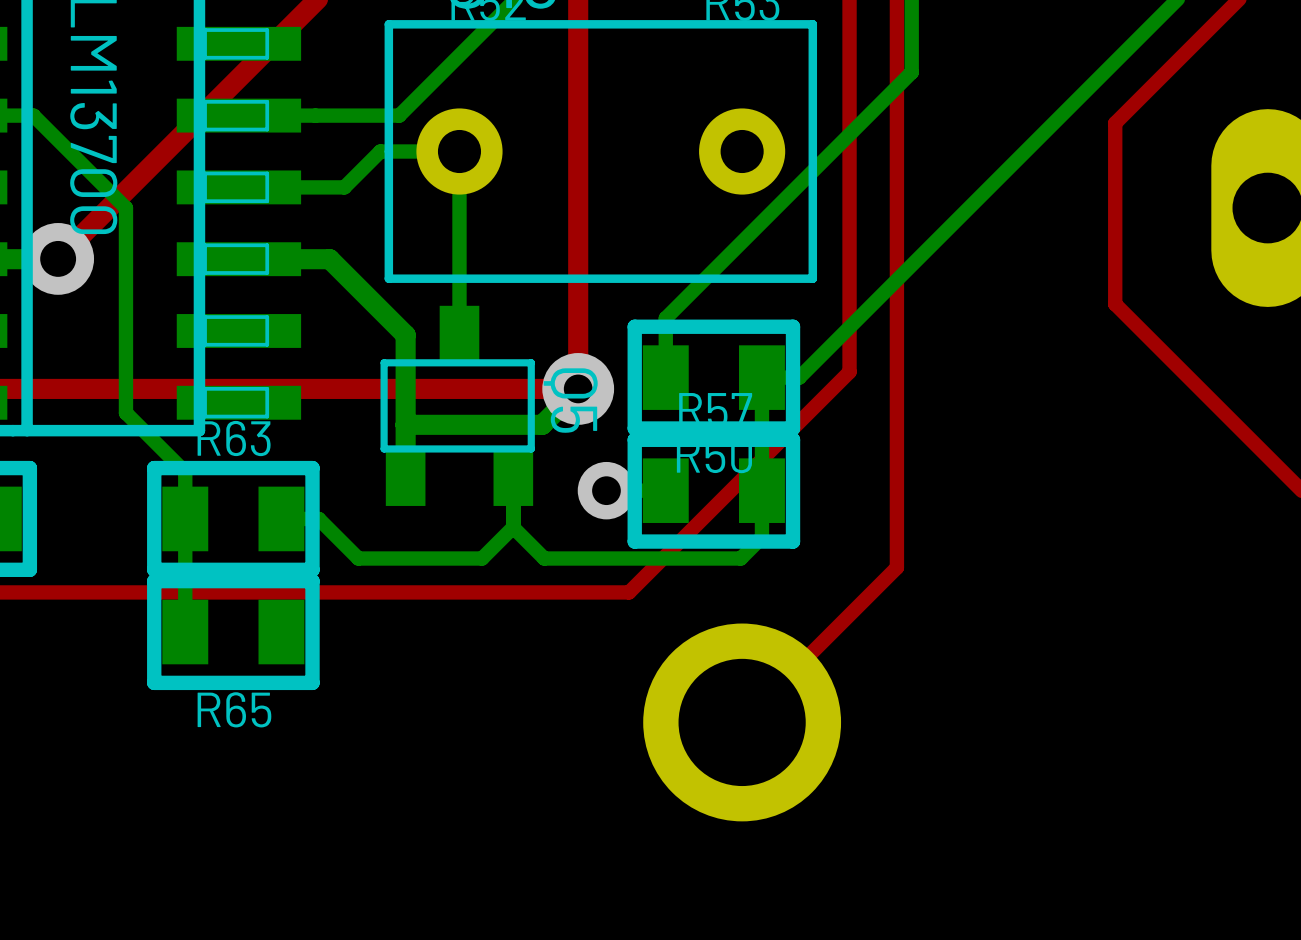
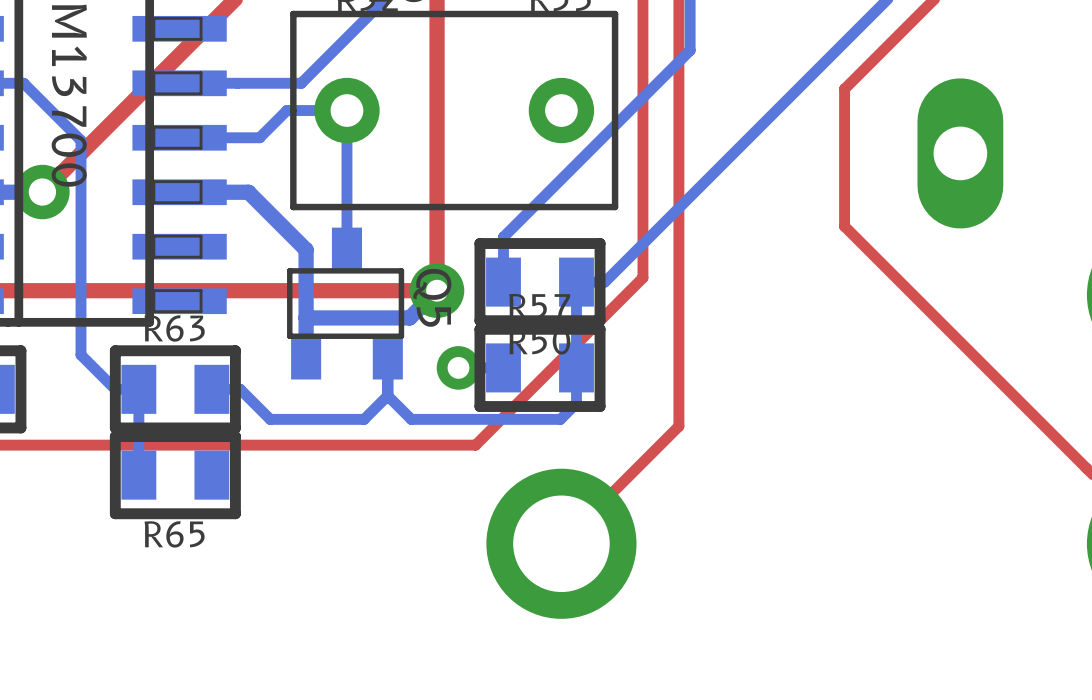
bottom track: (109, 191) (125, 208) (125, 412) (185, 472) (185, 518) -> (81, 140) (81, 355) (115, 389) (138, 389)

